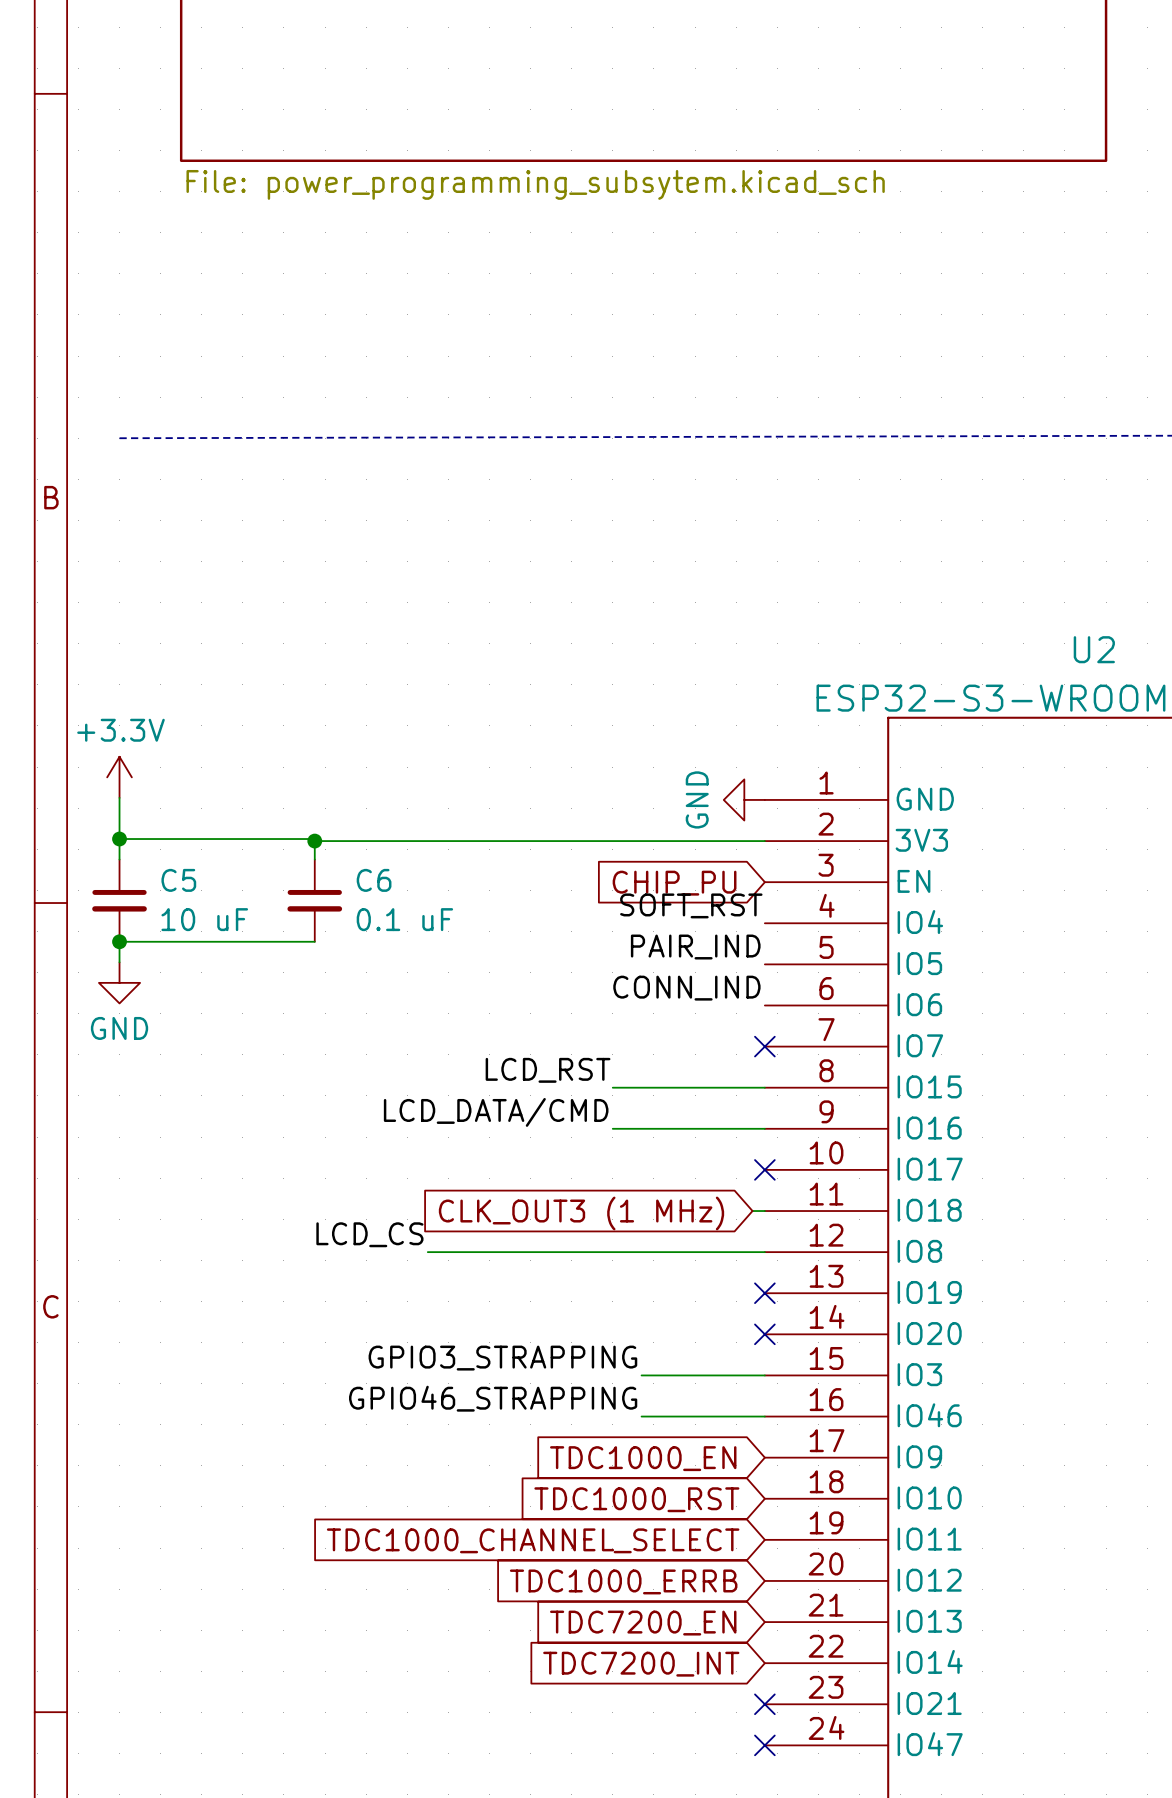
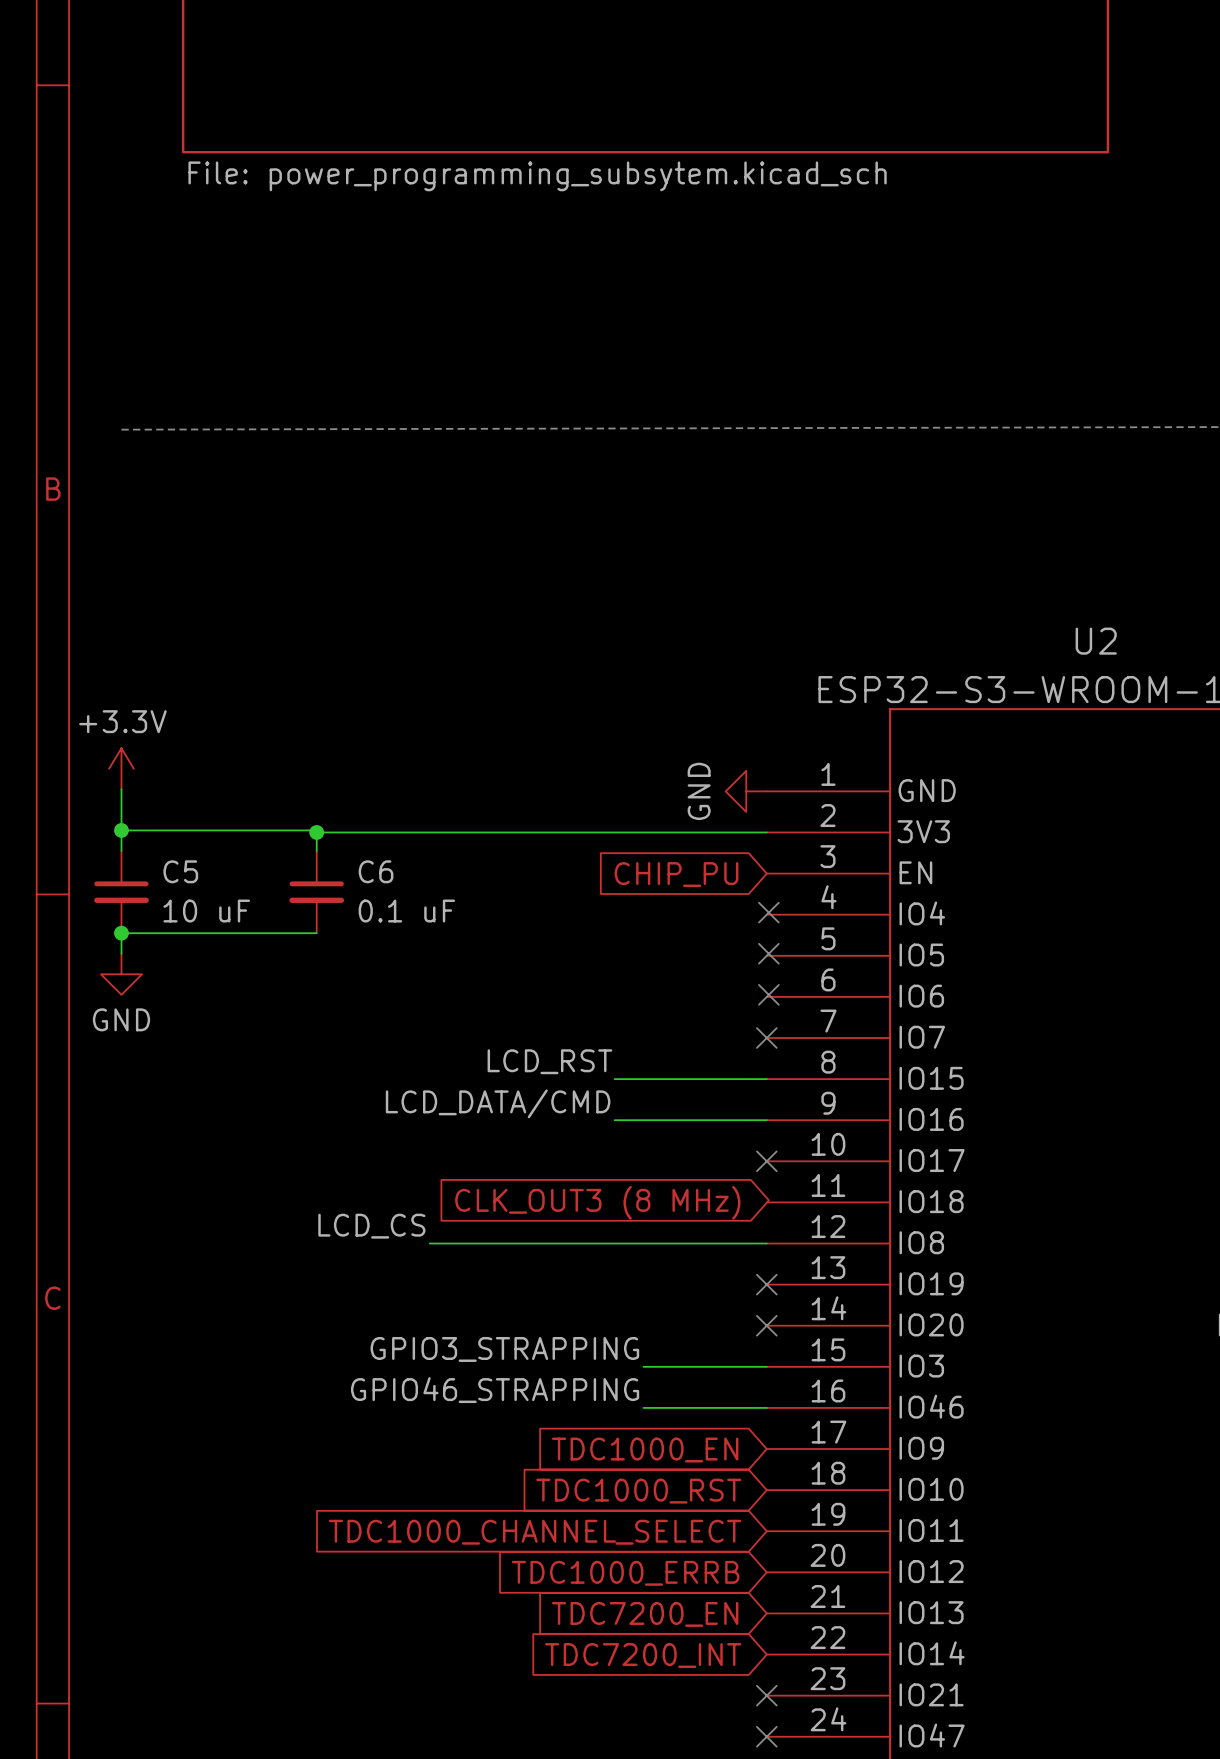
label: SOFT_RST (691, 905) -> none
no-connect mark: none -> (768, 912)
label: PAIR_IND (695, 947) -> none
no-connect mark: none -> (768, 953)
label: CONN_IND (686, 988) -> none
no-connect mark: none -> (768, 994)
wire: (752, 1211) (764, 1211) -> none
global label: CLK_OUT3 (1 MHz) (581, 1213) -> CLK_OUT3 (8 MHz) (597, 1202)

